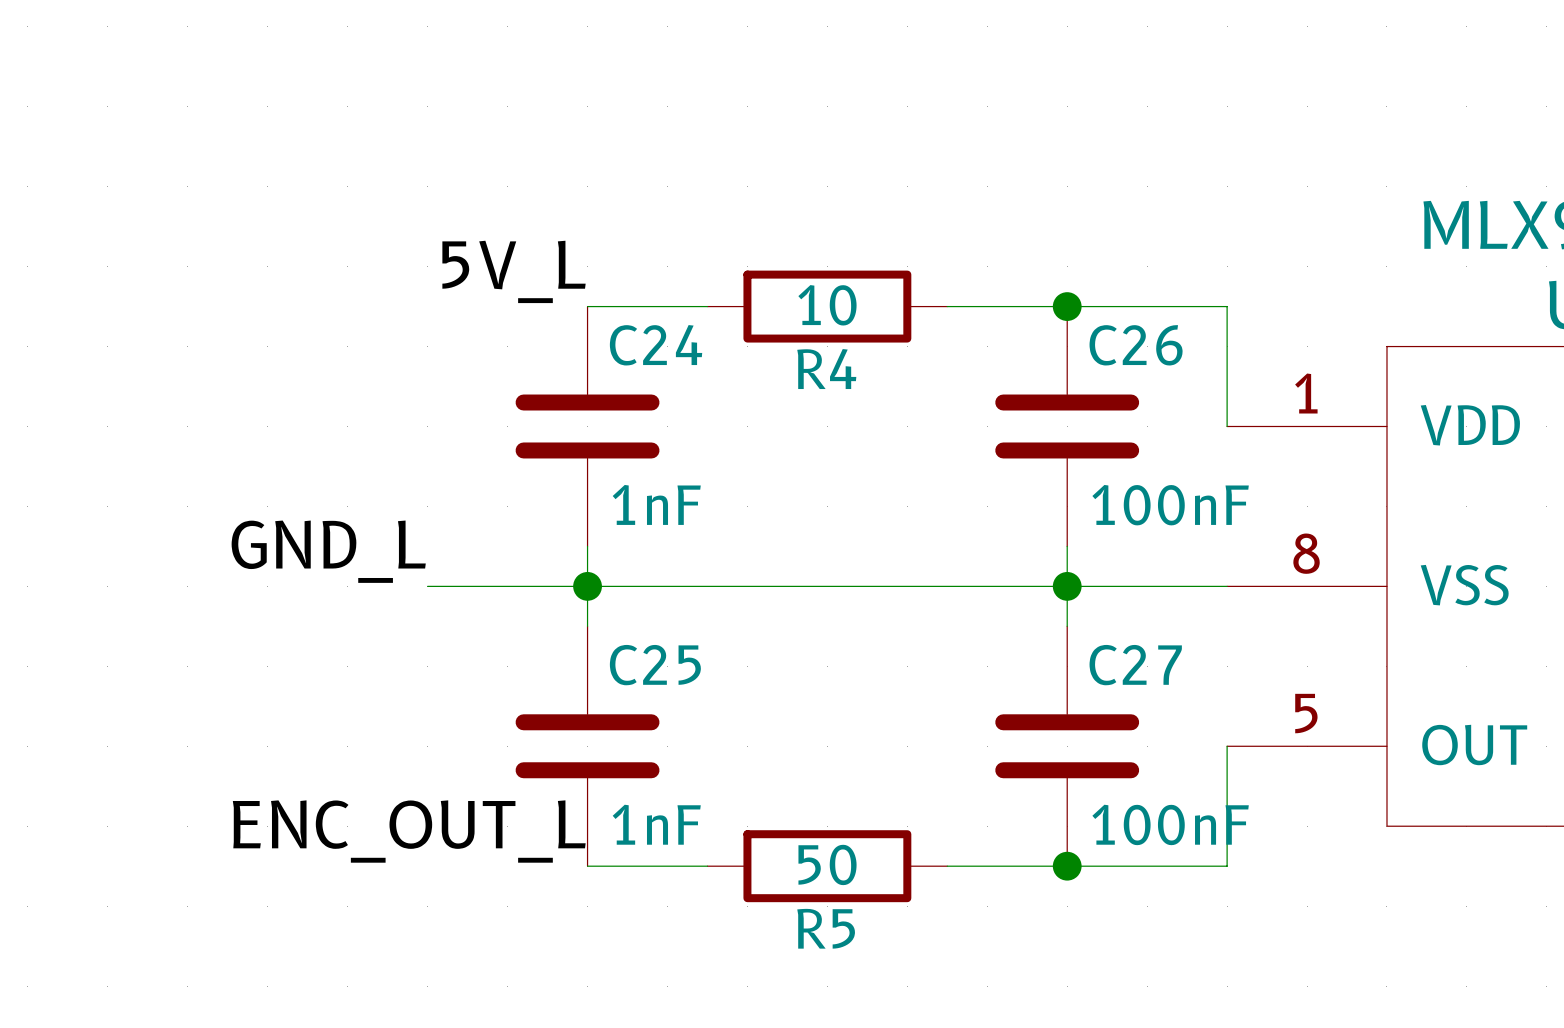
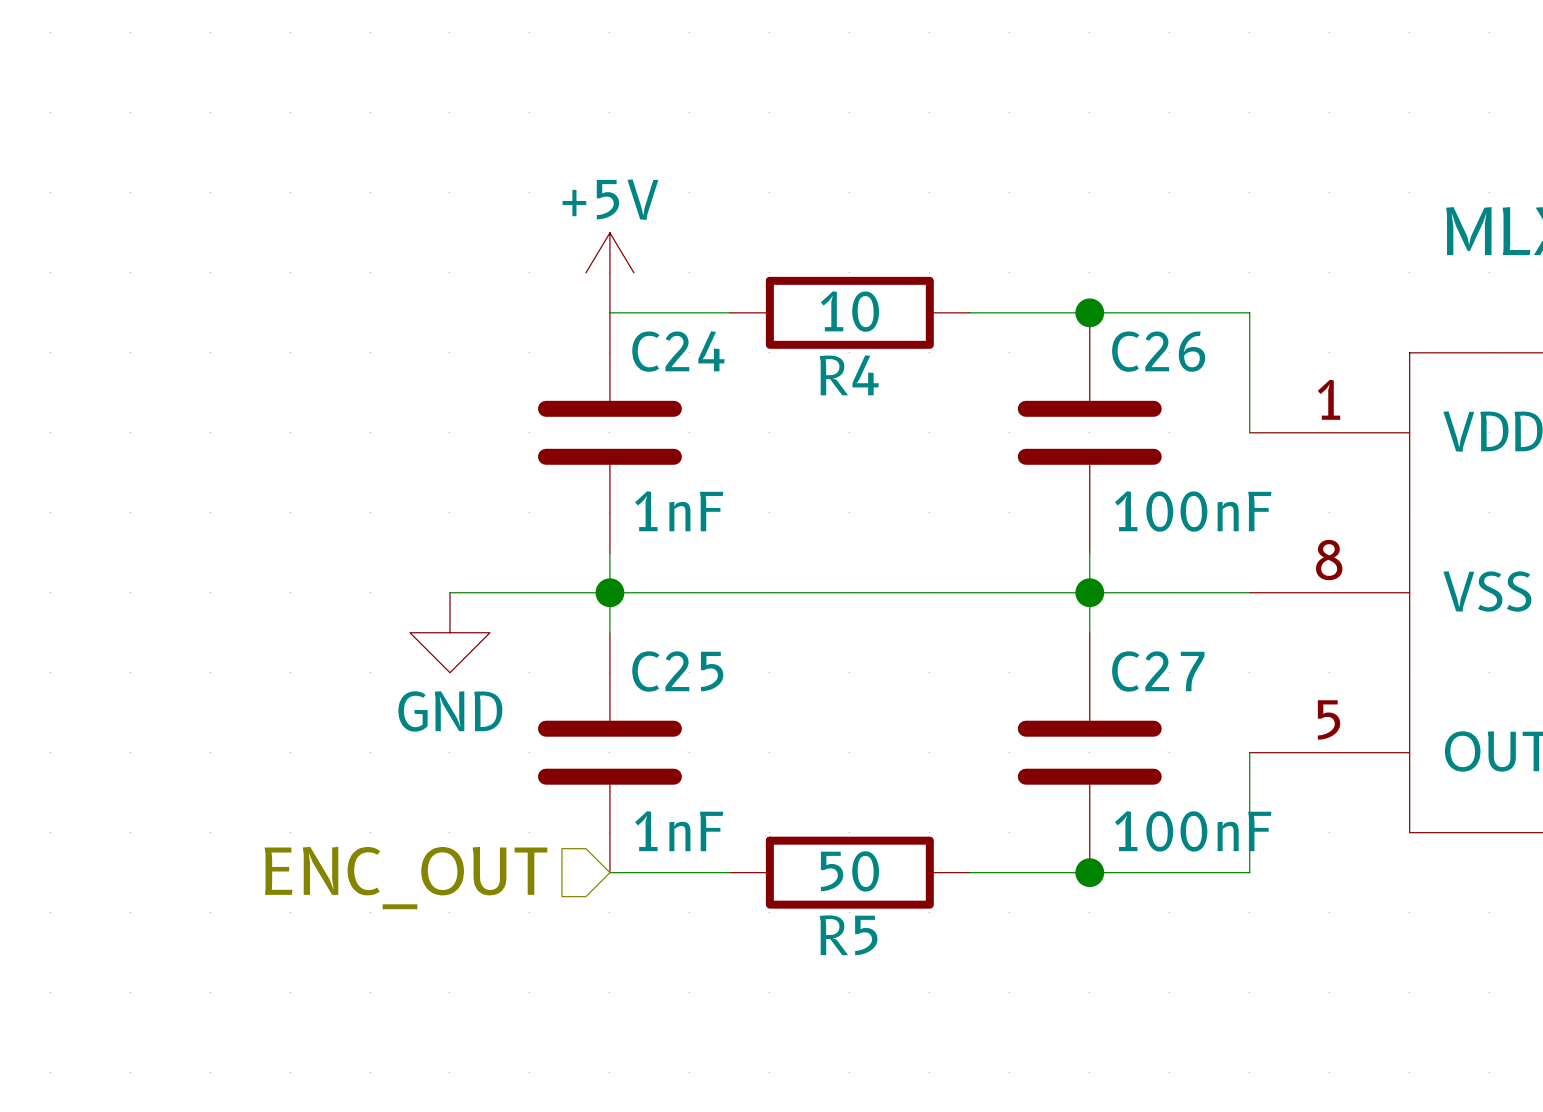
power symbol: none -> +5V (609, 272)
label: 5V_L (514, 271) -> none
label: GND_L (328, 551) -> none
power symbol: none -> GND (449, 632)
label: ENC_OUT_L (409, 831) -> none
hierarchical label: none -> ENC_OUT (405, 878)

